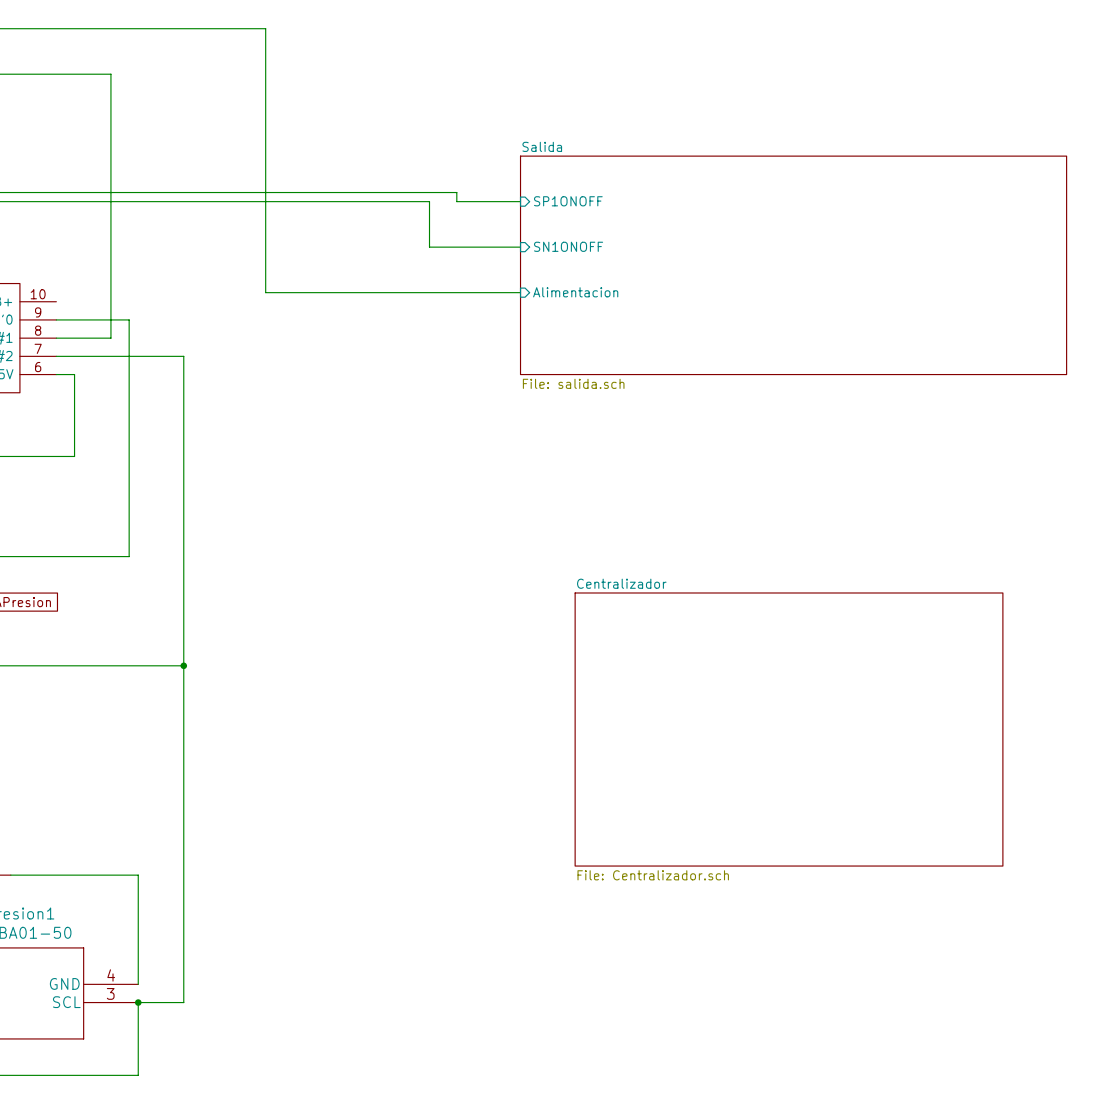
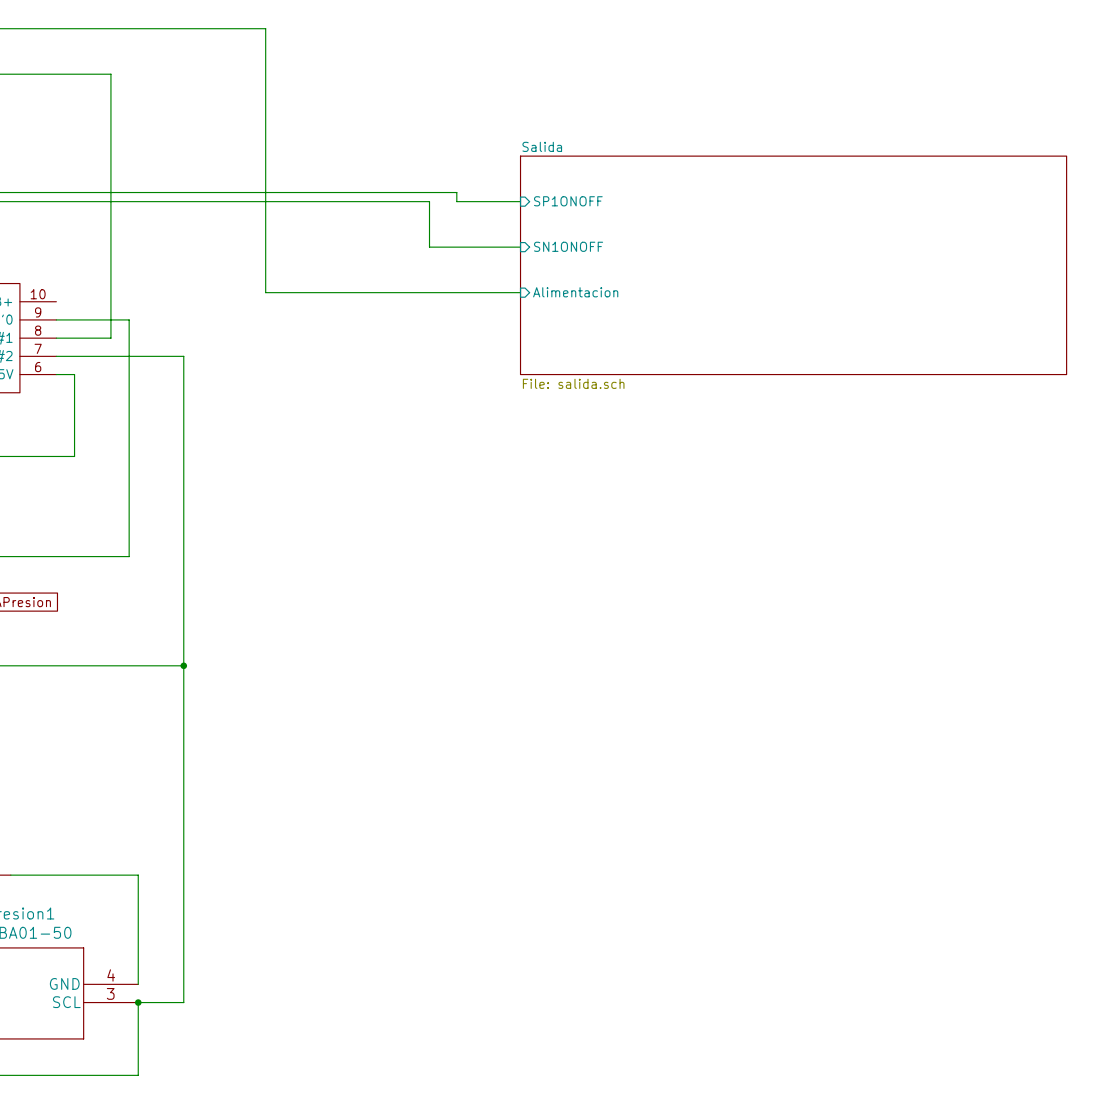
sheet Centralizador: File: Centralizador.sch (789, 729) -> none

